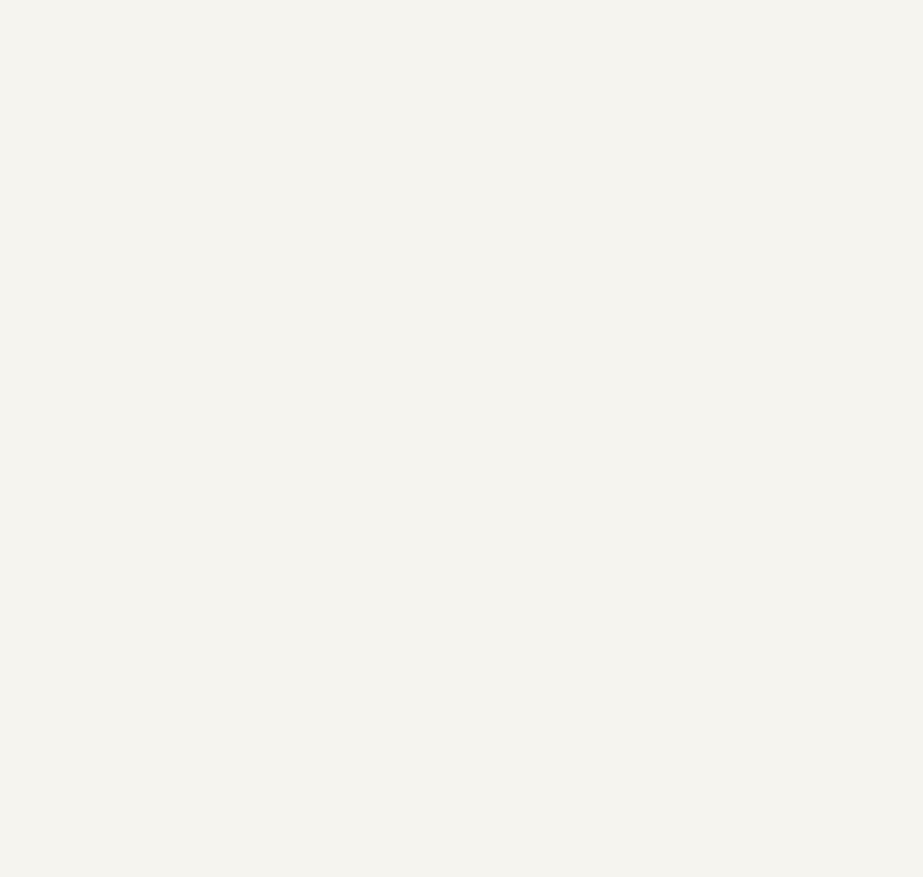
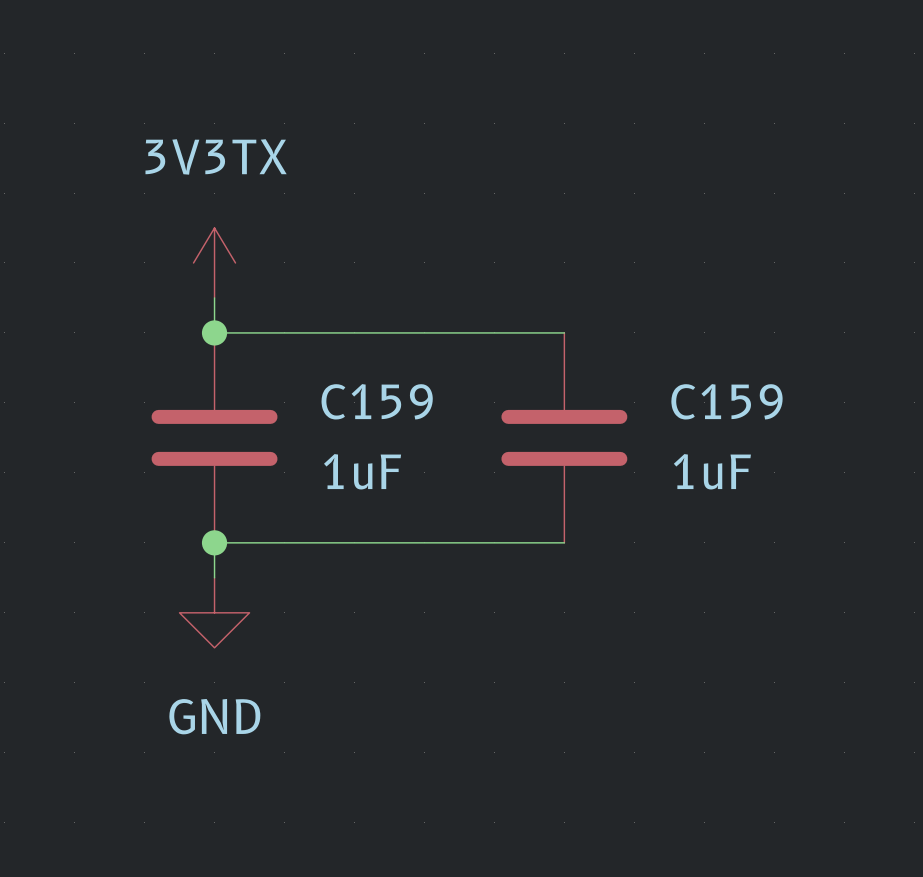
power symbol: none -> 3V3TX (214, 262)
wire: none -> (214, 297) (214, 332) (564, 332)
junction: none -> (214, 332)
C159: none -> 1uF (214, 437)
C159: none -> 1uF (564, 437)
junction: none -> (214, 542)
wire: none -> (564, 542) (214, 542) (214, 577)
power symbol: none -> GND (214, 612)

